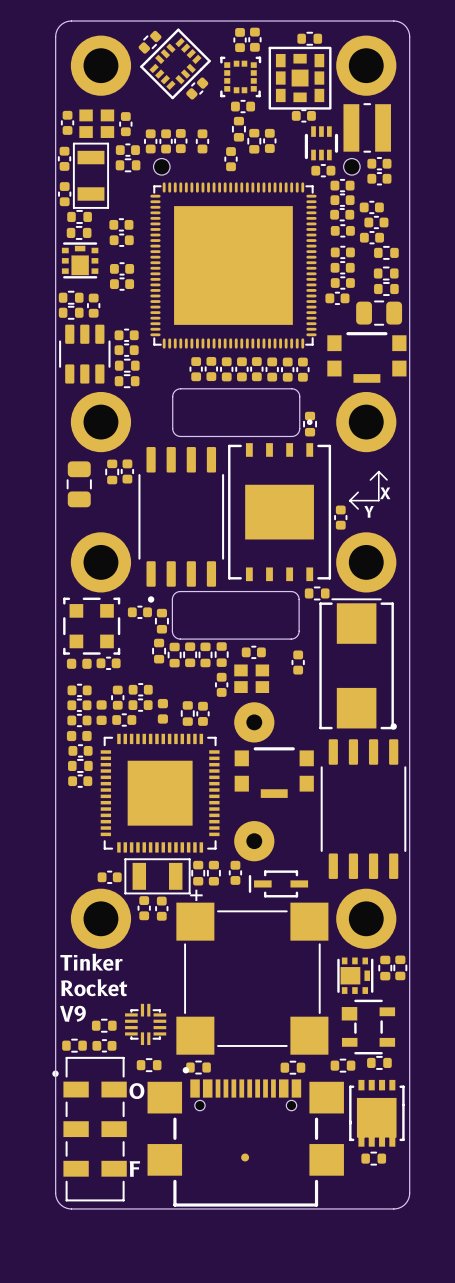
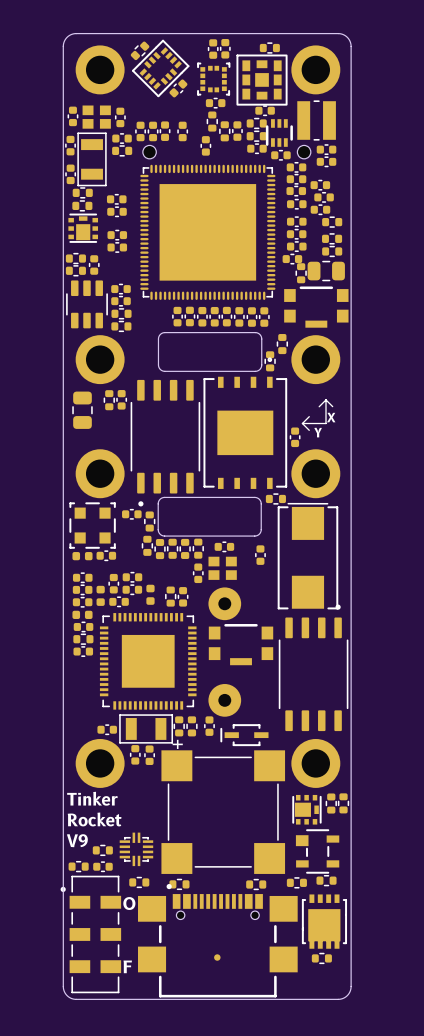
part: none -> (256, 123)
part: none -> (256, 136)
part: none -> (256, 148)
part: none -> (301, 273)
part: none -> (282, 344)

